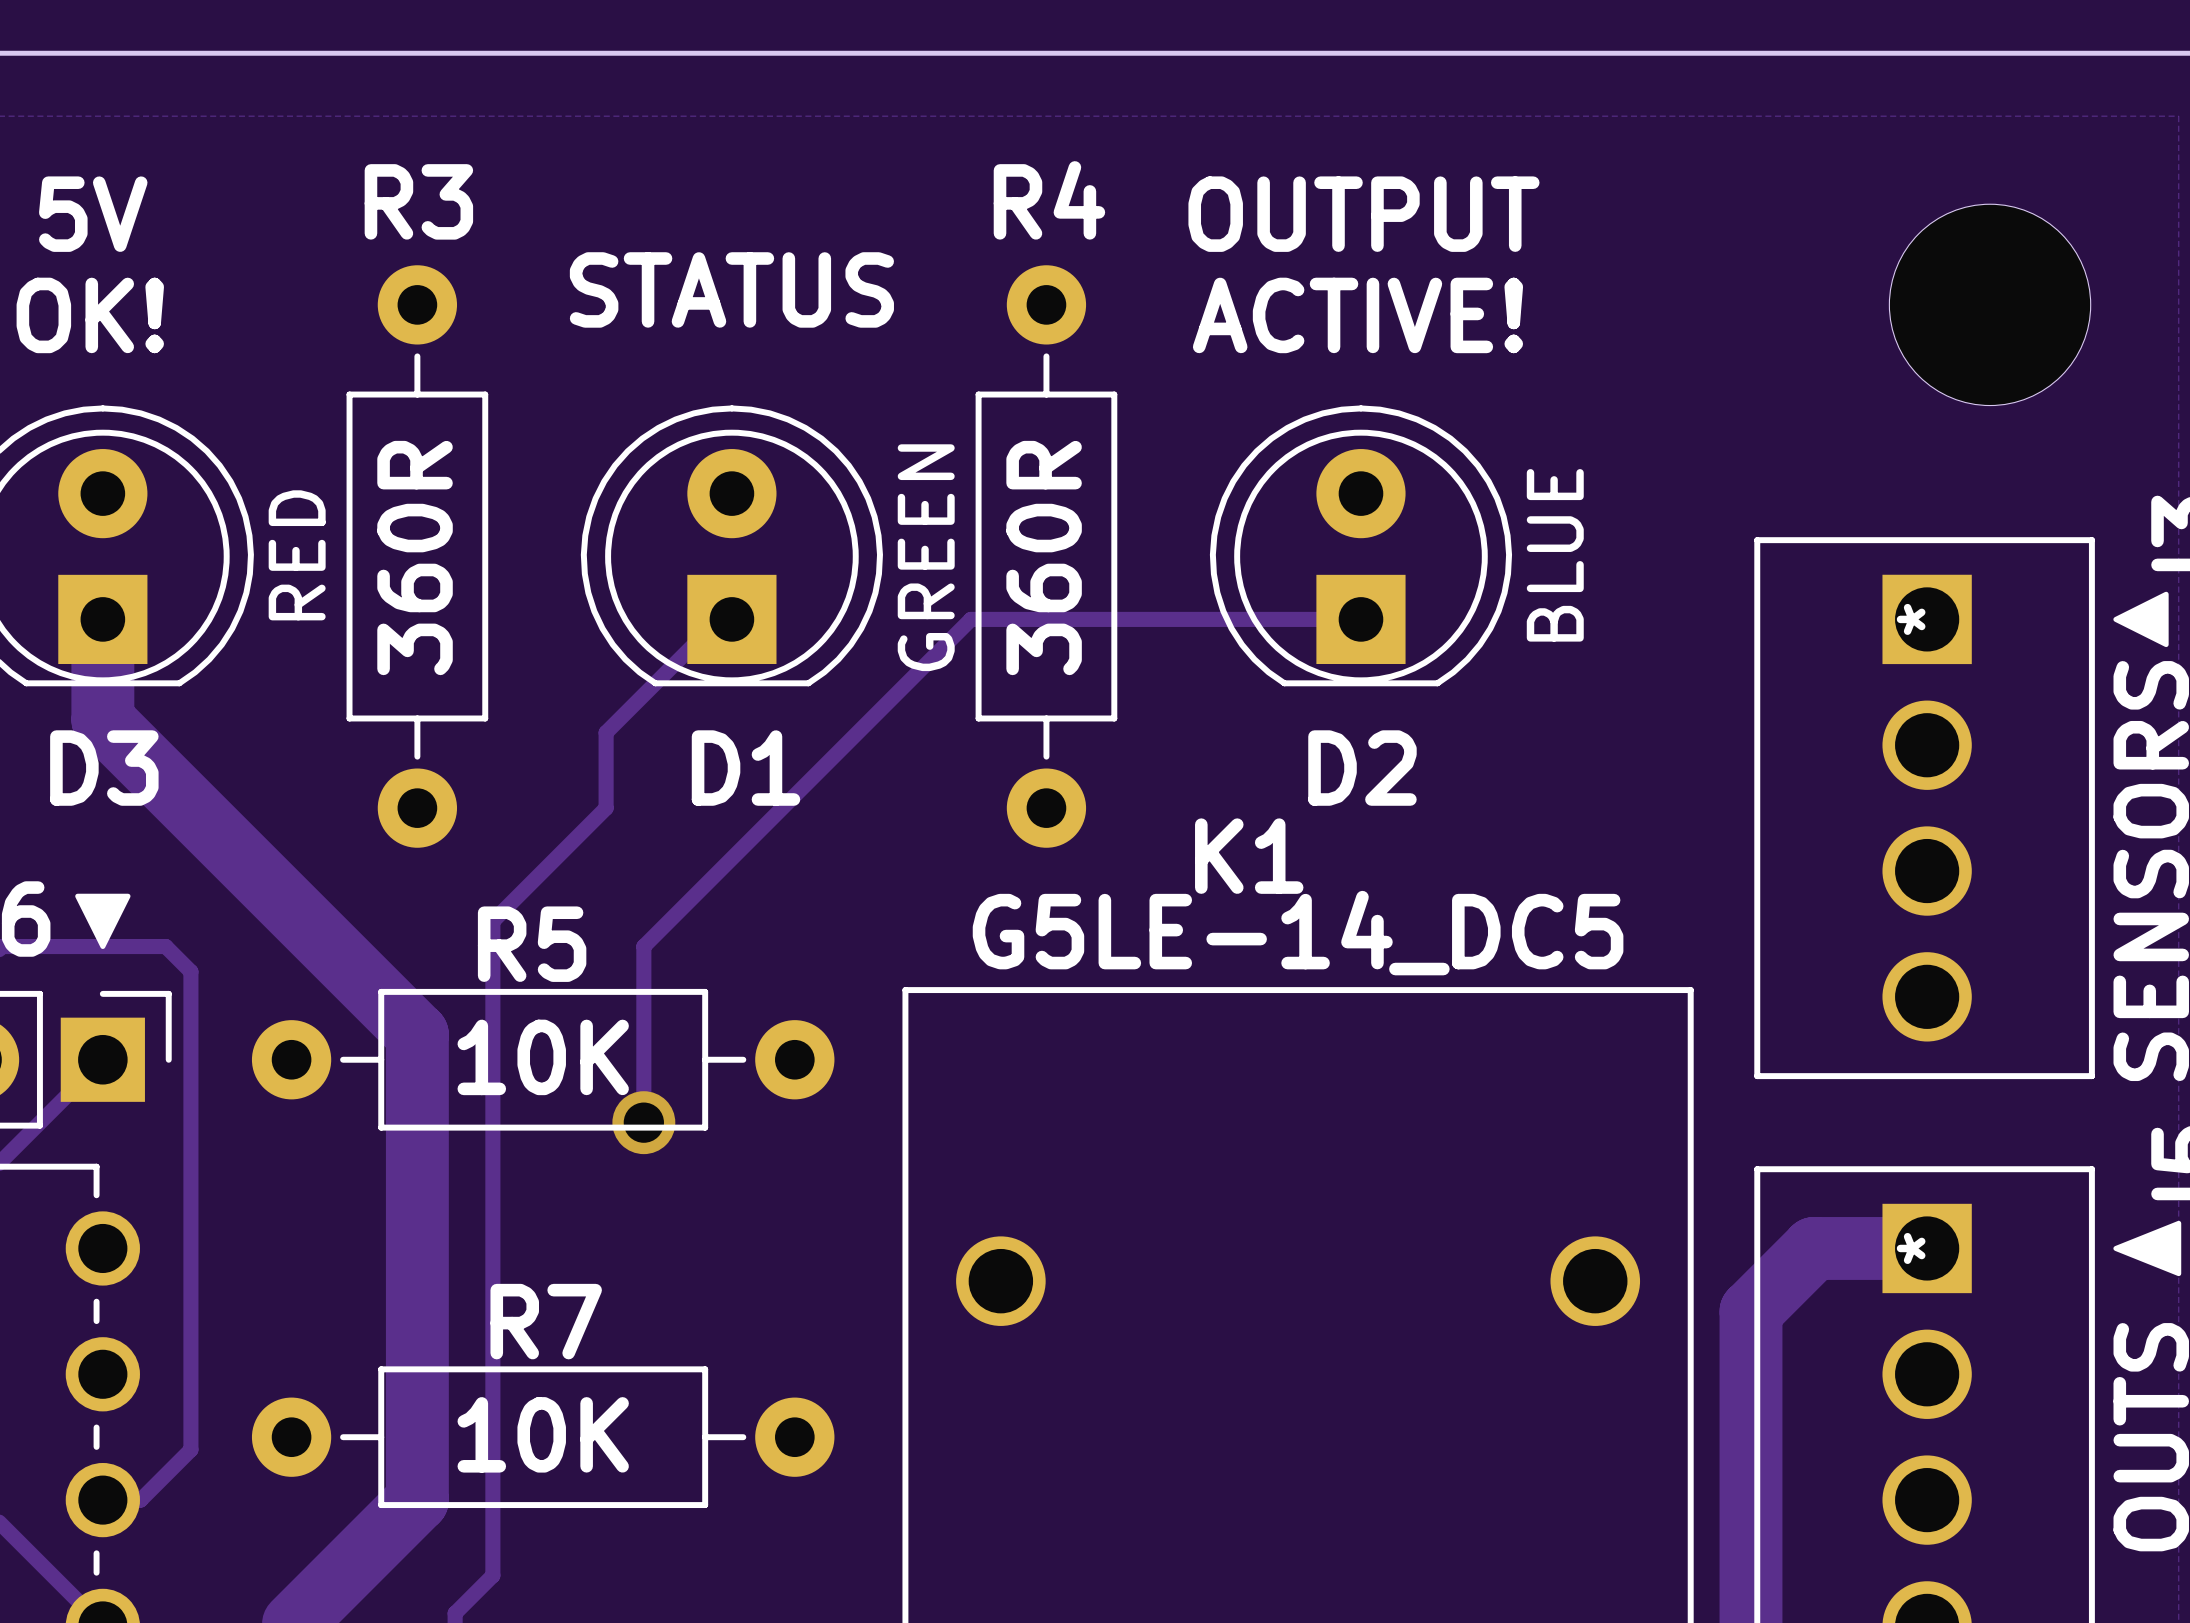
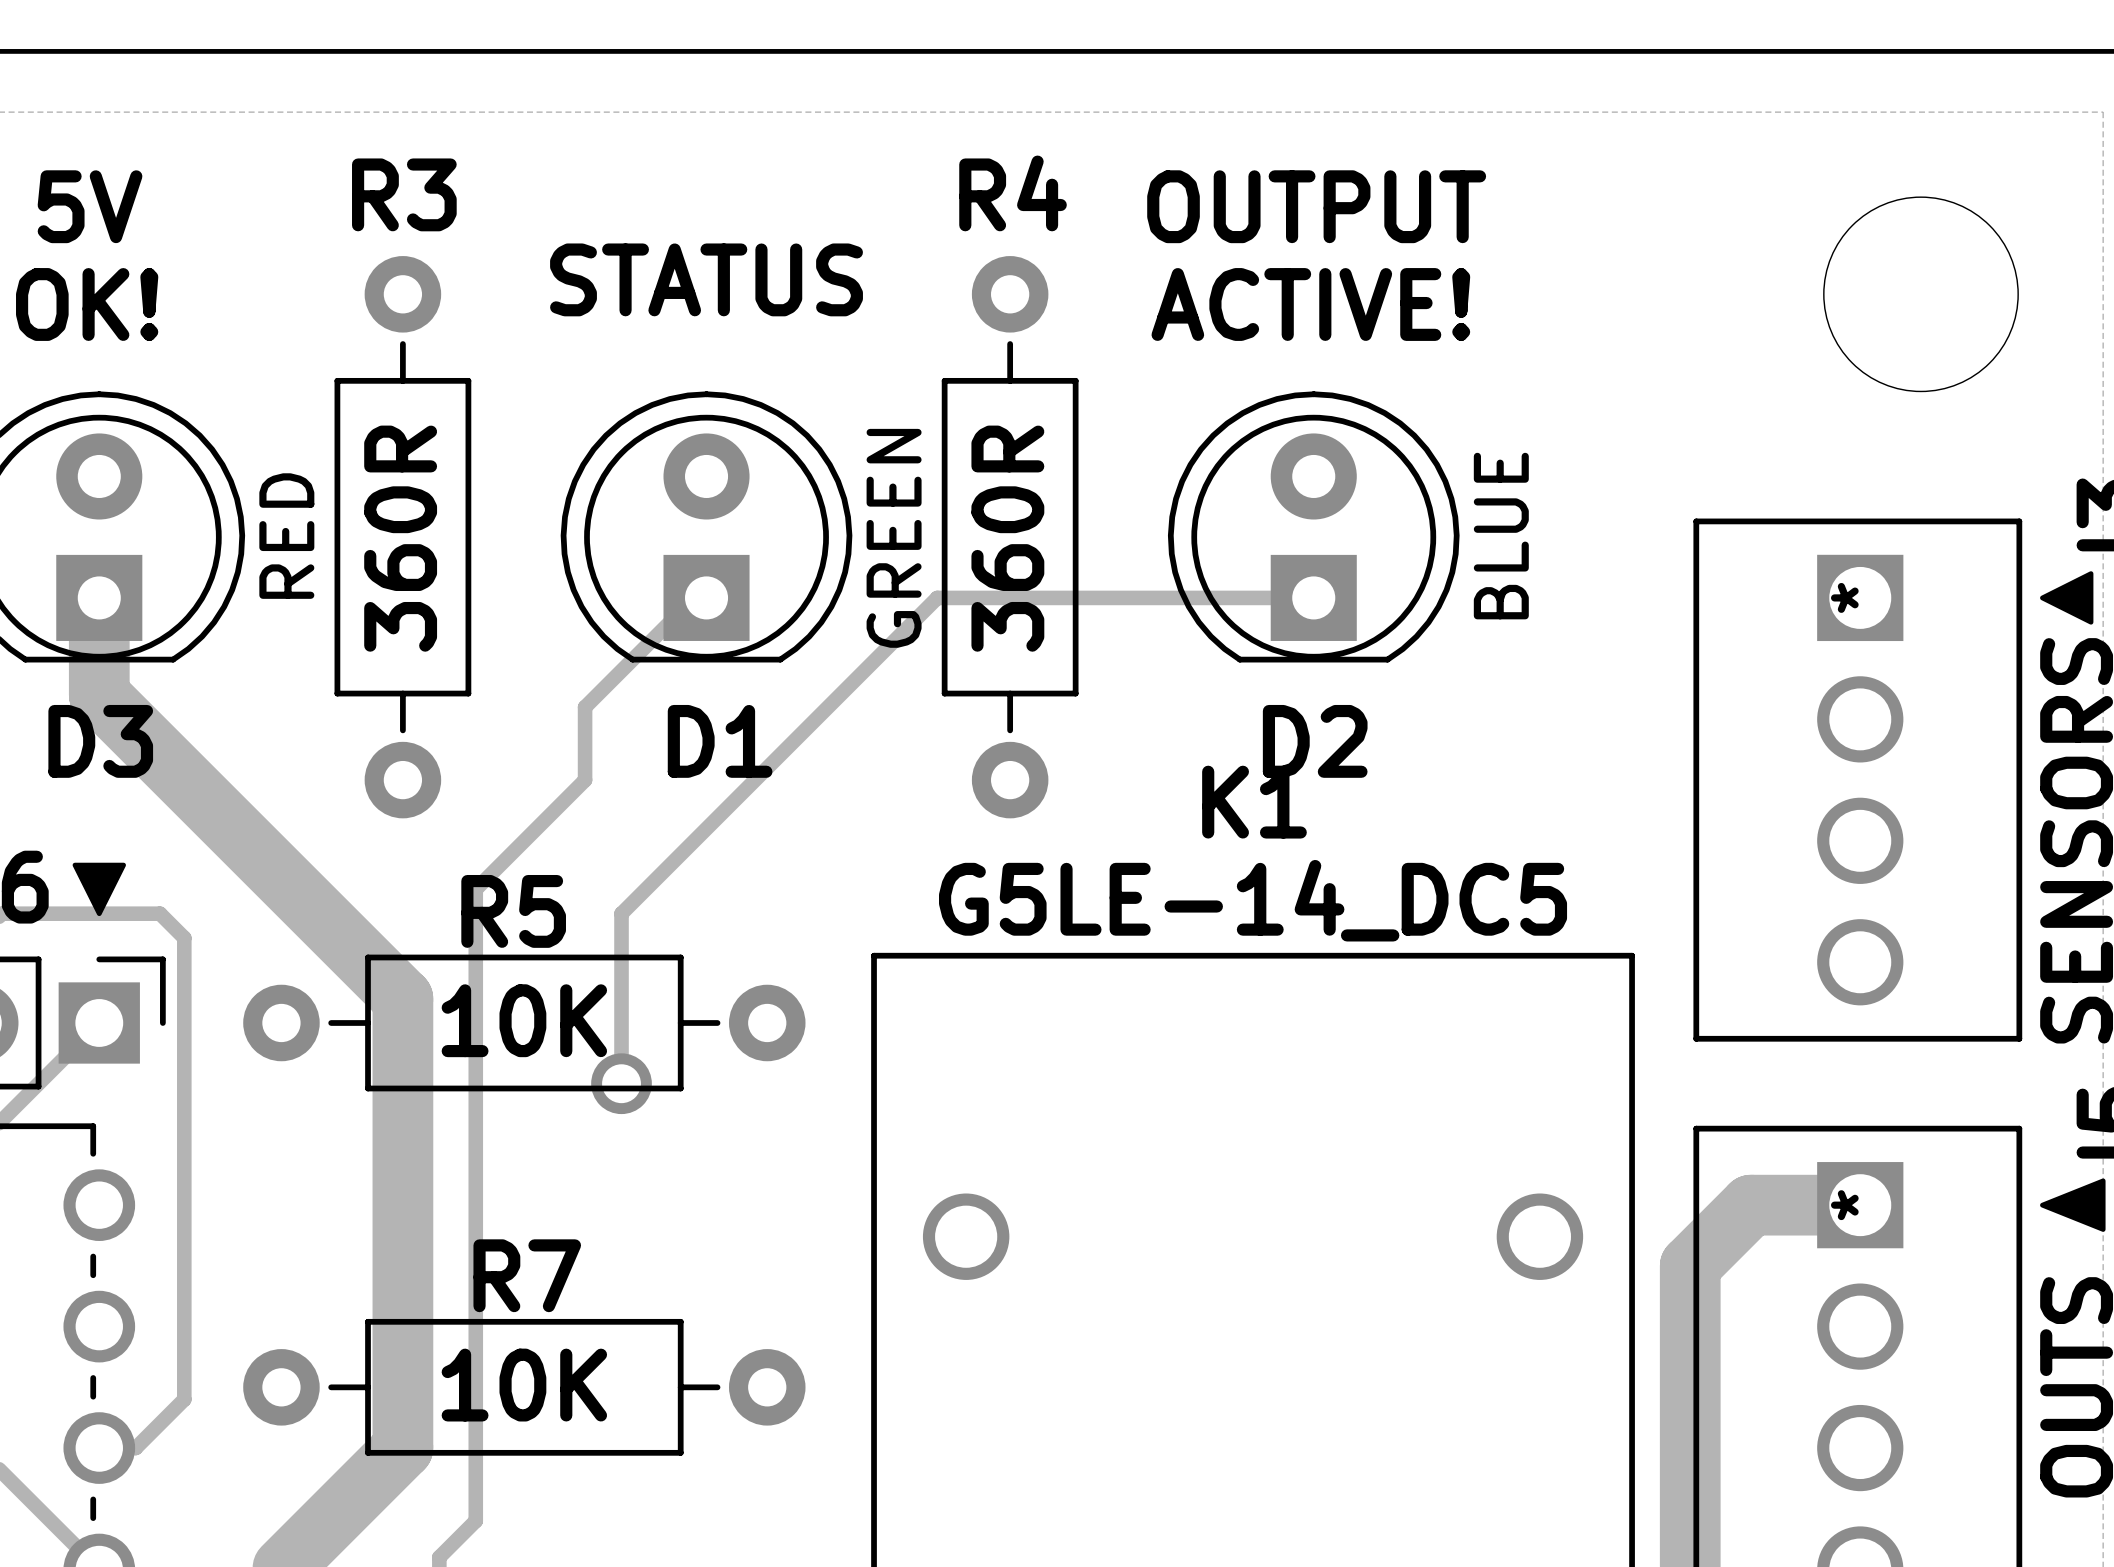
K1 name position: K1 (1249, 856) -> K1 (1254, 802)

